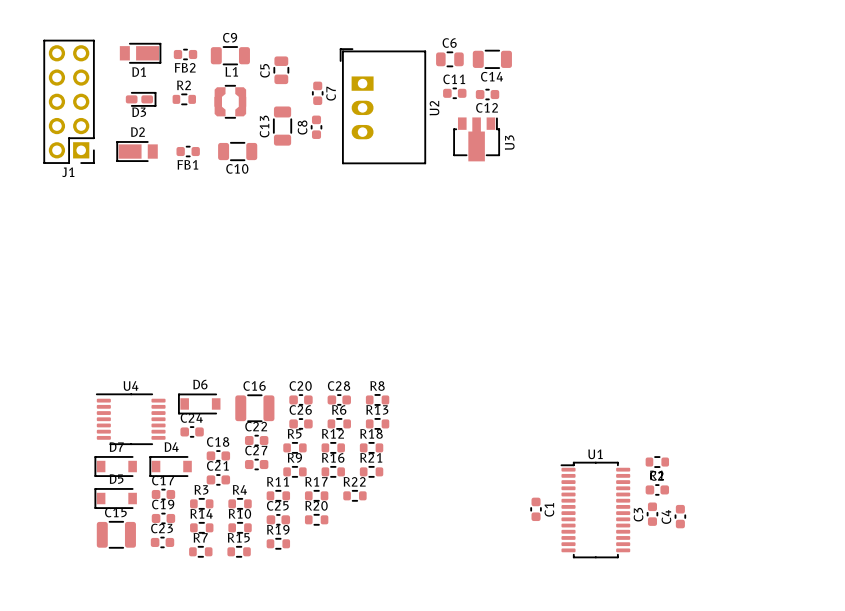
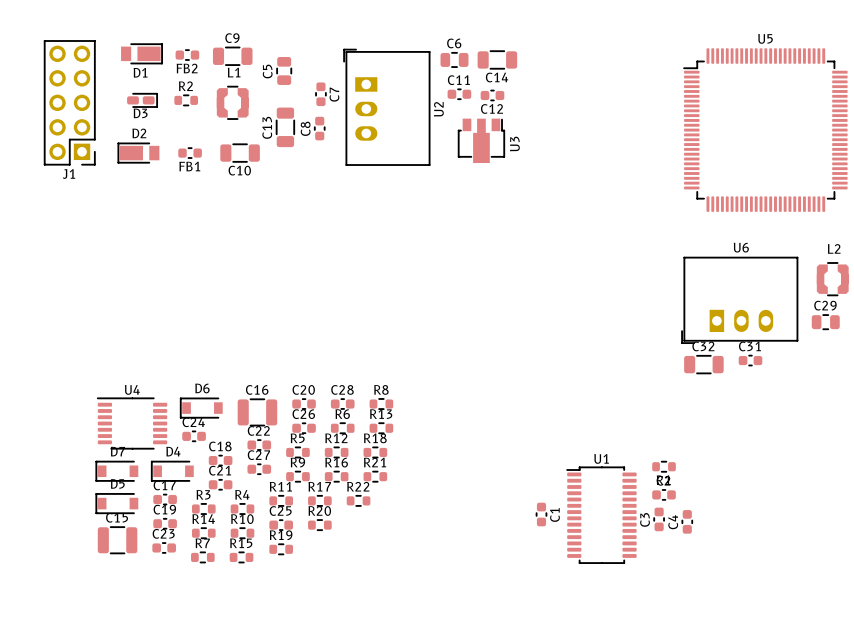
U5: none -> (765, 130)
L2: none -> (832, 279)
U6: none -> (739, 300)
C29: none -> (825, 322)
C31: none -> (750, 360)
C32: none -> (703, 364)

